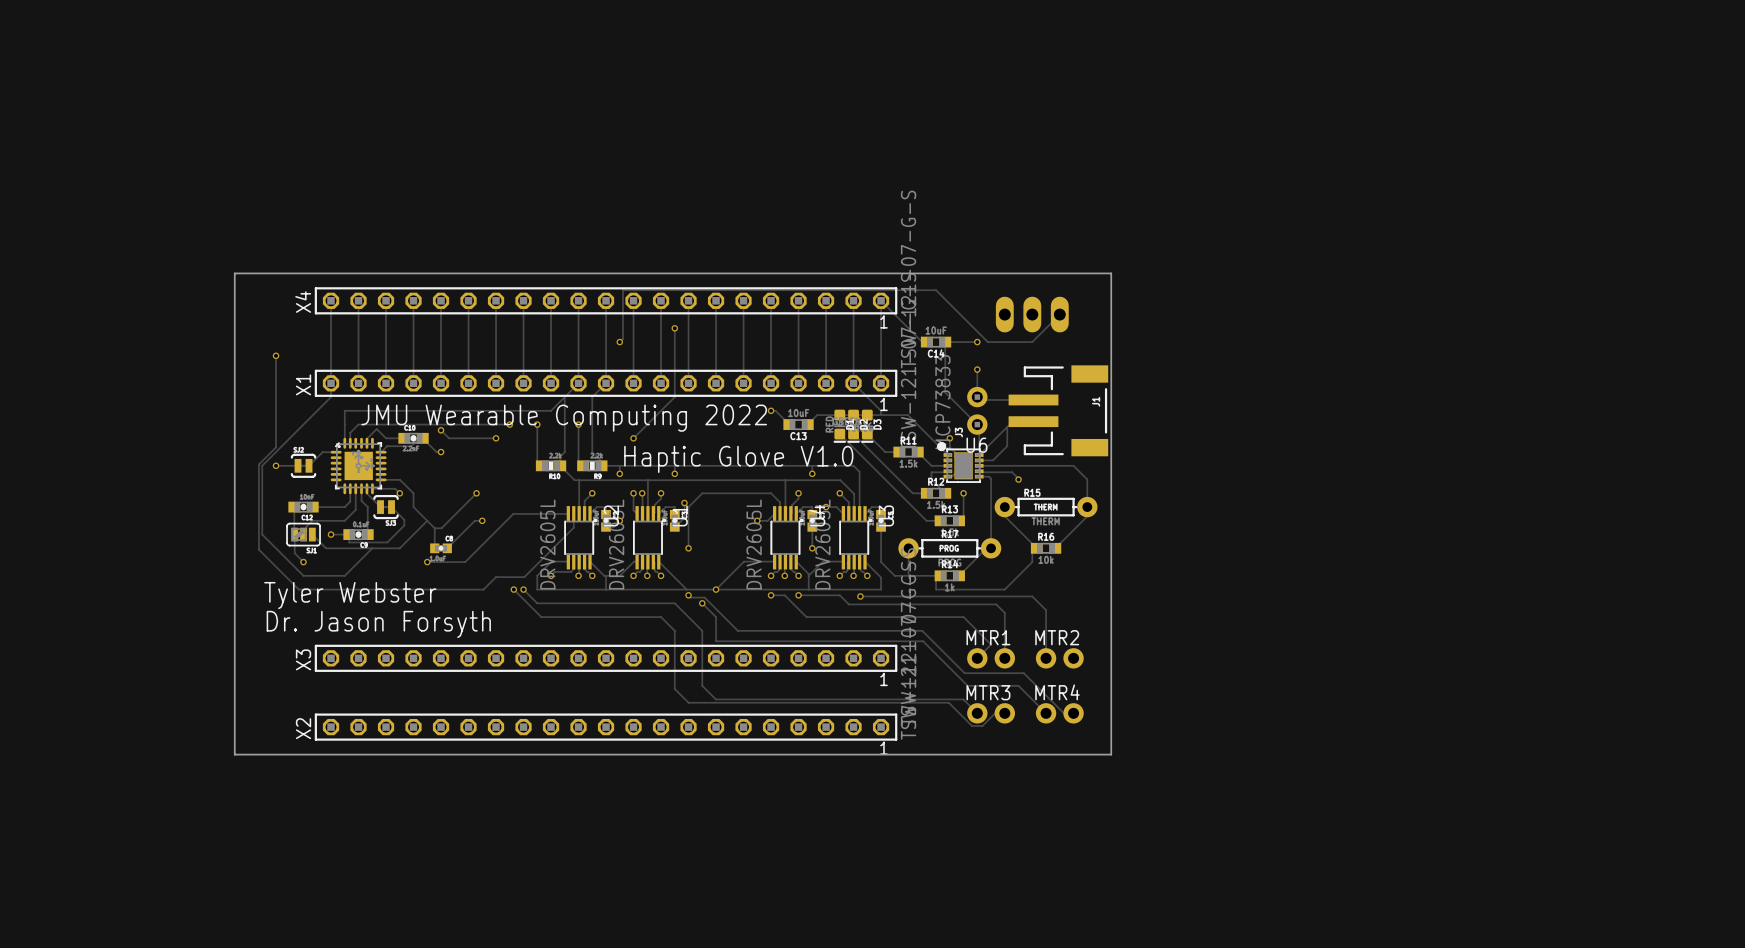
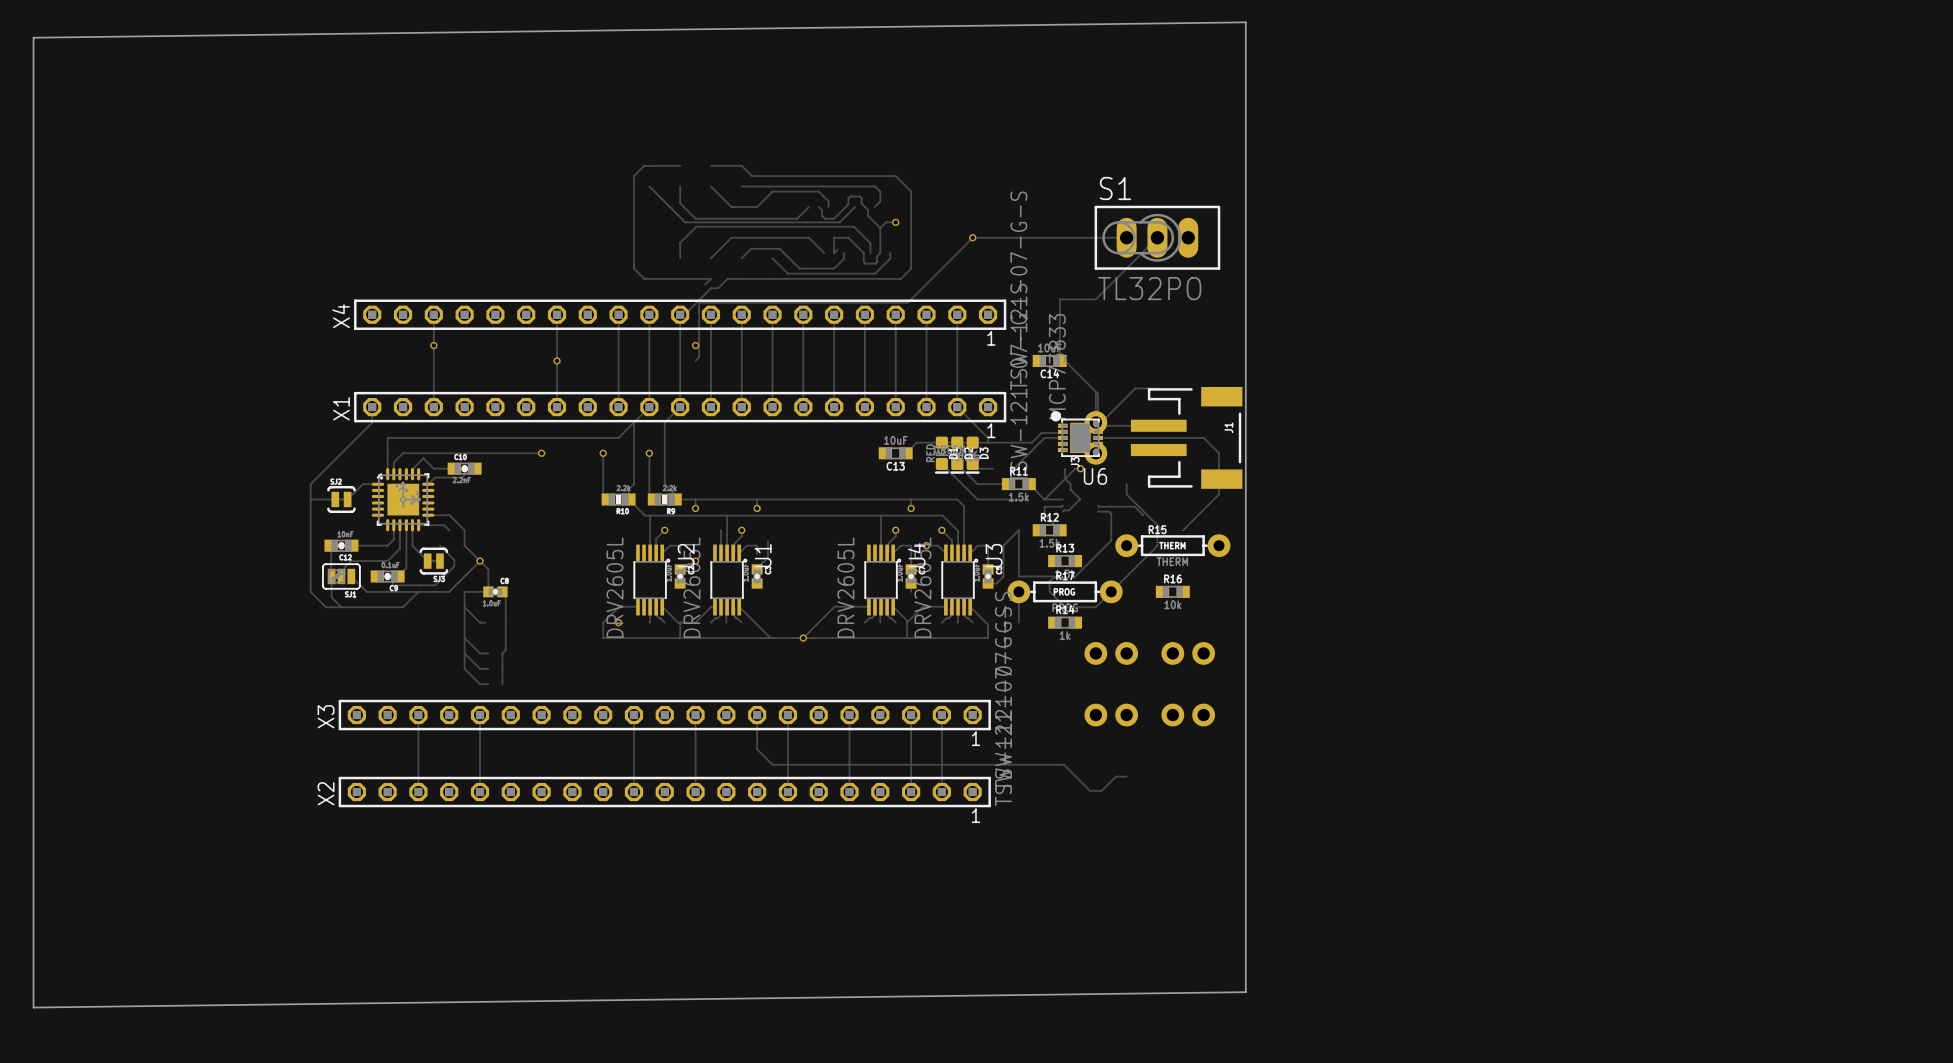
track: none -> (680, 165) (644, 165) (633, 176) (633, 268) (644, 278) (710, 278) (705, 284)
track: none -> (710, 165) (741, 165) (752, 176) (895, 176) (911, 191) (911, 268) (900, 278) (727, 278) (718, 288) (710, 288) (684, 314) (680, 314)
track: none -> (649, 186) (685, 222) (839, 222) (855, 206)
track: none -> (680, 186) (680, 203) (695, 218) (797, 218) (808, 206)
track: none -> (710, 186) (731, 206) (757, 206) (772, 191) (818, 191) (828, 201) (828, 206)
track: none -> (741, 186) (875, 186) (880, 191) (880, 201) (874, 206)
track: none -> (818, 206) (824, 218) (834, 218) (848, 204) (850, 196) (860, 196) (861, 203) (868, 210) (868, 215) (880, 227)
track: none -> (895, 222) (885, 222) (880, 227)
via: none -> (895, 222)
track: none -> (880, 227) (880, 253) (877, 256) (875, 263) (865, 263) (863, 253) (848, 237) (834, 237) (834, 253) (837, 249)
via: none -> (972, 237)
track: none -> (1157, 237) (1095, 299) (1059, 299) (1059, 355) (1098, 393) (1098, 425) (1135, 388) (1158, 388)
track: none -> (824, 253) (808, 237) (731, 237) (710, 258)
track: none -> (843, 253) (843, 258) (834, 268) (799, 268) (779, 248) (751, 248) (741, 258)
track: none -> (870, 253) (870, 243) (853, 226) (696, 226) (680, 242) (680, 258)
track: none -> (890, 253) (890, 258) (875, 273) (787, 273) (772, 258)
board edge: (1111, 273) (234, 273) (234, 754) (1111, 754) -> (1245, 284) (1245, 22) (33, 37) (33, 1007) (1245, 992) (1245, 822)
track: (809, 290) (936, 290) (987, 342) (1032, 342) (1059, 314) -> (907, 302) (972, 237) (1126, 237)
track: (331, 300) (331, 383) -> none
track: (358, 300) (358, 383) -> none
track: (413, 300) (413, 383) -> none
track: (441, 300) (441, 383) -> none
track: (468, 300) (468, 383) -> none
track: (523, 300) (523, 383) -> none
S1 side: bottom (1032, 314) -> top (1157, 237)
via: none -> (433, 345)
track: (674, 328) (674, 397) (633, 438) -> none
via: (674, 328) -> none
via: none -> (557, 360)
via position: (619, 342) -> (695, 345)
track: (926, 342) (922, 342) (881, 300) (881, 383) -> none
track: (977, 342) (945, 342) (945, 392) (979, 426) (979, 455) (1012, 421) (1033, 421) -> none
via: (977, 342) -> none
track: (276, 355) (276, 447) (258, 464) (258, 549) (298, 589) (483, 589) (496, 577) (524, 577) (573, 527) (573, 513) -> none
via: (276, 355) -> none
via: (977, 369) -> none
track: (771, 410) (775, 410) (789, 424) -> none
via: (771, 410) -> none
track: none -> (1062, 437) (1044, 437) (1013, 468)
track: (907, 415) (947, 455) (947, 460) -> (1018, 442) (1031, 442) (1041, 433) (1062, 431)
text: JMU Wearable Computing 2022 (564, 418) -> none
track: (482, 424) (509, 424) -> none
via: none -> (541, 453)
via: (509, 424) -> none
track: (1007, 427) (1007, 446) (993, 460) (979, 460) -> none
track: (441, 430) (449, 438) (496, 438) -> none
via: (441, 430) -> none
track: (422, 438) (436, 452) (441, 452) -> (464, 607) (480, 622) (485, 622)
via: (496, 438) -> none
via: (633, 438) -> none
track: (871, 438) (885, 452) -> (977, 484) (992, 484)
track: none -> (977, 468) (993, 468)
via position: (949, 438) -> (1080, 468)
track: none -> (1080, 468) (1075, 468) (1044, 499)
track: (276, 452) (262, 465) (262, 534) (276, 548) -> (310, 484) (310, 591)
via: (441, 452) -> none
track: (871, 452) (912, 493) (926, 493) -> none
track: none -> (1126, 484) (1126, 494) (1162, 530) (1157, 530) (1157, 545) (1095, 607) (1065, 607) (1049, 591) (1049, 581) (1054, 576) (1018, 576) (1018, 530) (1003, 545) (1003, 576) (996, 583) (988, 583)
text: Haptic Glove V1.0 (738, 459) -> none
U6 position: (960, 462) -> (1076, 434)
via: (276, 465) -> none
track: (871, 465) (926, 520) (940, 520) -> (977, 499) (1023, 499)
track: (979, 465) (1073, 465) (1087, 479) (1087, 516) (1055, 548) -> (1098, 437) (1203, 437) (1219, 453) (1219, 494) (1183, 530)
via: (1018, 479) -> none
track: (366, 493) (380, 507) -> (412, 530) (412, 545) (427, 561)
via: (399, 493) -> none
track: (476, 493) (441, 528) (434, 528) -> none
via: (476, 493) -> none
track: (633, 493) (633, 510) (637, 513) -> none
via: (633, 493) -> none
via: (642, 493) -> none
track: (963, 493) (963, 516) (959, 520) -> none
via: (963, 493) -> none
track: (361, 500) (367, 507) (367, 534) -> (406, 538) (406, 568) (397, 576)
track: (991, 502) (991, 548) (986, 548) (959, 575) -> (1111, 540) (1075, 576)
via: (684, 503) -> none
part position: (386, 507) -> (433, 561)
track: (1004, 507) (1004, 516) (1036, 548) (1032, 548) (1032, 562) (1004, 589) (936, 589) (936, 580) (940, 575) (894, 575) (881, 562) (881, 528) -> none
track: (568, 513) (513, 513) (465, 562) (427, 562) -> none
track: (774, 513) (767, 520) (757, 520) -> none
track: (780, 513) (780, 502) (771, 493) (702, 493) (688, 507) (688, 548) -> none
track: none -> (911, 554) (911, 568)
track: none -> (988, 554) (988, 568)
via: none -> (480, 561)
track: (482, 520) (474, 520) (447, 548) -> none
via: (482, 520) -> none
part position: (606, 520) -> (680, 576)
part position: (674, 520) -> (757, 576)
via: (757, 520) -> none
part position: (812, 520) -> (911, 576)
part position: (881, 520) -> (988, 576)
via: (331, 534) -> none
part position: (358, 534) -> (387, 576)
track: none -> (488, 591) (464, 591) (464, 668) (480, 684) (488, 684)
via: (688, 548) -> none
via: (812, 548) -> none
track: none -> (505, 595) (505, 650) (502, 653) (502, 684)
track: (573, 561) (573, 569) (571, 571) (554, 571) (551, 575) -> none
track: (289, 562) (303, 575) (344, 575) (358, 562) -> (326, 607) (403, 607)
via: (303, 562) -> none
via: (427, 562) -> none
via: (578, 575) -> none
via: (592, 575) -> none
via: (633, 575) -> none
via: (647, 575) -> none
via: (661, 575) -> none
via: (771, 575) -> none
via: (784, 575) -> none
via: (798, 575) -> none
via: (839, 575) -> none
via: (853, 575) -> none
via: (867, 575) -> none
track: none -> (464, 638) (480, 653) (488, 653)
track: (513, 589) (541, 617) (661, 617) (674, 630) (674, 658) -> none
via: (513, 589) -> none
track: (523, 589) (537, 603) (674, 603) (702, 630) (702, 658) -> none
via: (523, 589) -> none
text: Tyler Webster (350, 595) -> none
track: (688, 595) (690, 597) (704, 597) (737, 630) (922, 630) (964, 673) (1023, 673) (1063, 713) (1073, 713) -> none
via: (688, 595) -> none
track: (771, 595) (784, 595) (806, 617) (963, 617) (991, 644) (977, 658) -> none
via: (771, 595) -> none
track: (798, 595) (839, 595) (848, 604) (996, 604) (1004, 612) (1004, 658) -> none
via: (798, 595) -> none
track: (860, 596) (1032, 596) (1046, 610) (1046, 658) -> none
via: (860, 596) -> none
track: none -> (464, 653) (480, 668) (488, 668)
track: (702, 603) (716, 617) (716, 641) (923, 641) (967, 685) (1018, 685) (1046, 713) -> none
via: (702, 603) -> none
part: none -> (1111, 653)
part: none -> (1188, 653)
text: Dr. Jason Forsyth (378, 624) -> none
text: MTR1 (988, 637) -> none
text: MTR2 (1057, 637) -> none
track: none -> (418, 715) (418, 792)
track: none -> (480, 715) (480, 792)
track: none -> (633, 715) (633, 792)
X3 position: (606, 658) -> (664, 715)
track: none -> (695, 715) (695, 792)
track: none -> (849, 715) (849, 792)
track: none -> (911, 715) (911, 792)
track: none -> (941, 715) (941, 792)
track: (702, 685) (715, 699) (963, 699) (977, 713) -> (787, 745) (787, 792)
text: MTR3 (988, 692) -> none
text: MTR4 (1057, 692) -> none
part: (991, 713) -> none
part: (1059, 713) -> none
X2 position: (606, 727) -> (664, 792)

